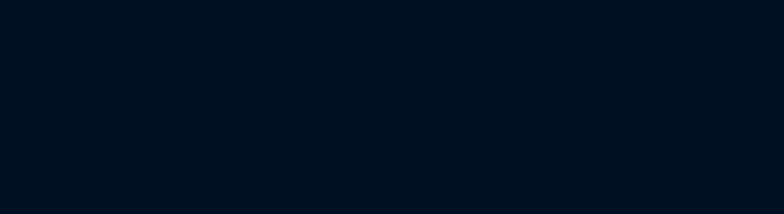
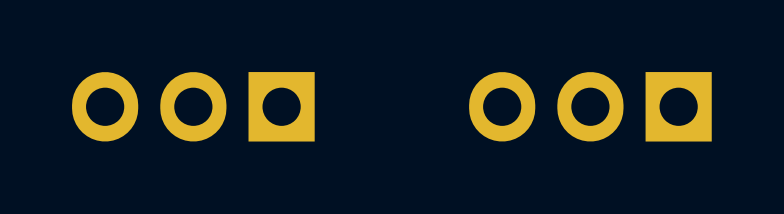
part: none -> (193, 106)
part: none -> (590, 106)

